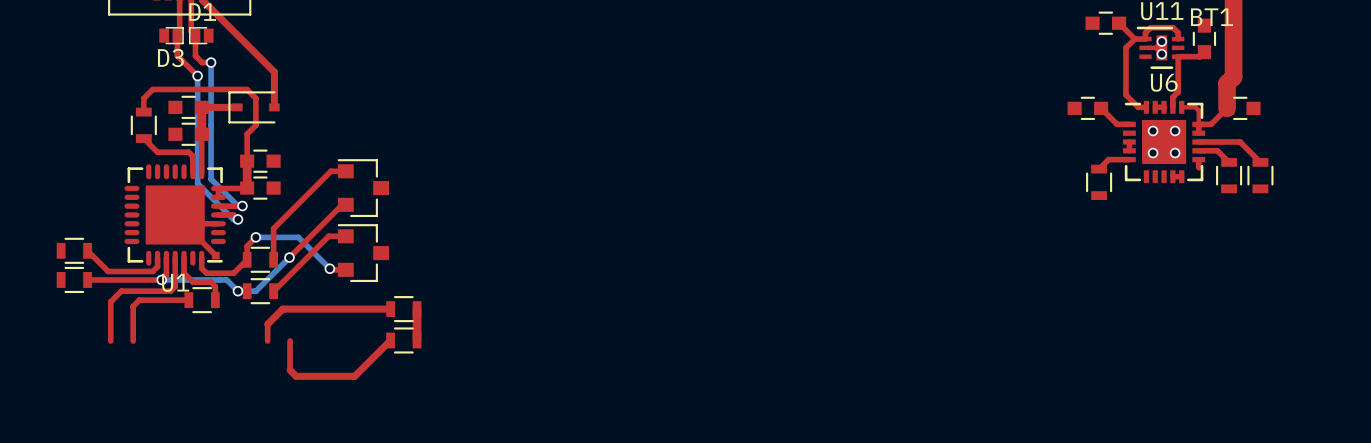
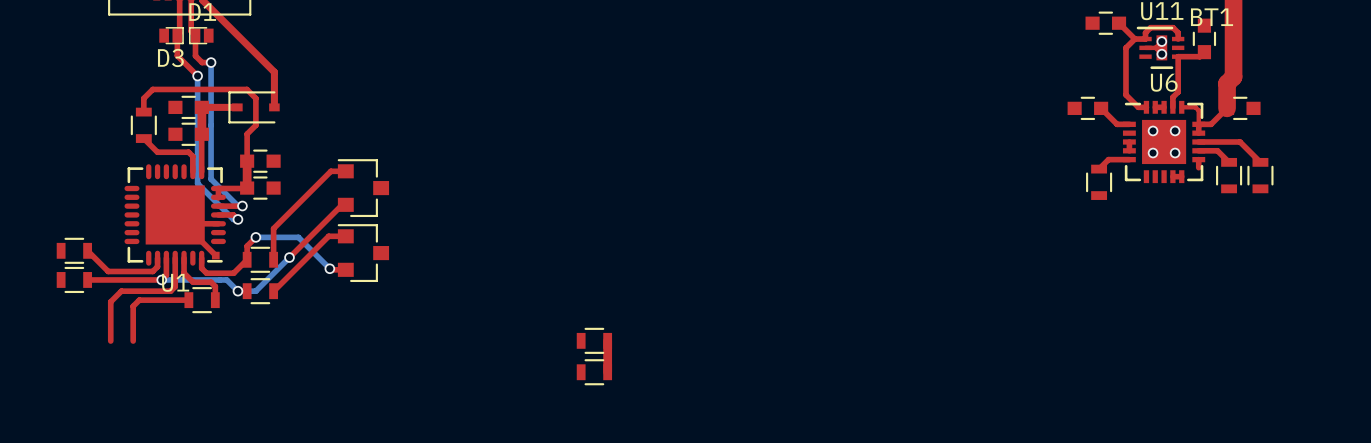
top track: (390, 309) (282, 309) (267, 324) (267, 341) -> none
part: (403, 309) -> none
top track: (417, 309) (417, 340) -> (607, 340) (607, 372)
top track: (390, 340) (354, 376) (296, 376) (290, 370) (290, 341) -> none
part: (403, 340) -> none
part: none -> (594, 340)
part: none -> (594, 372)

